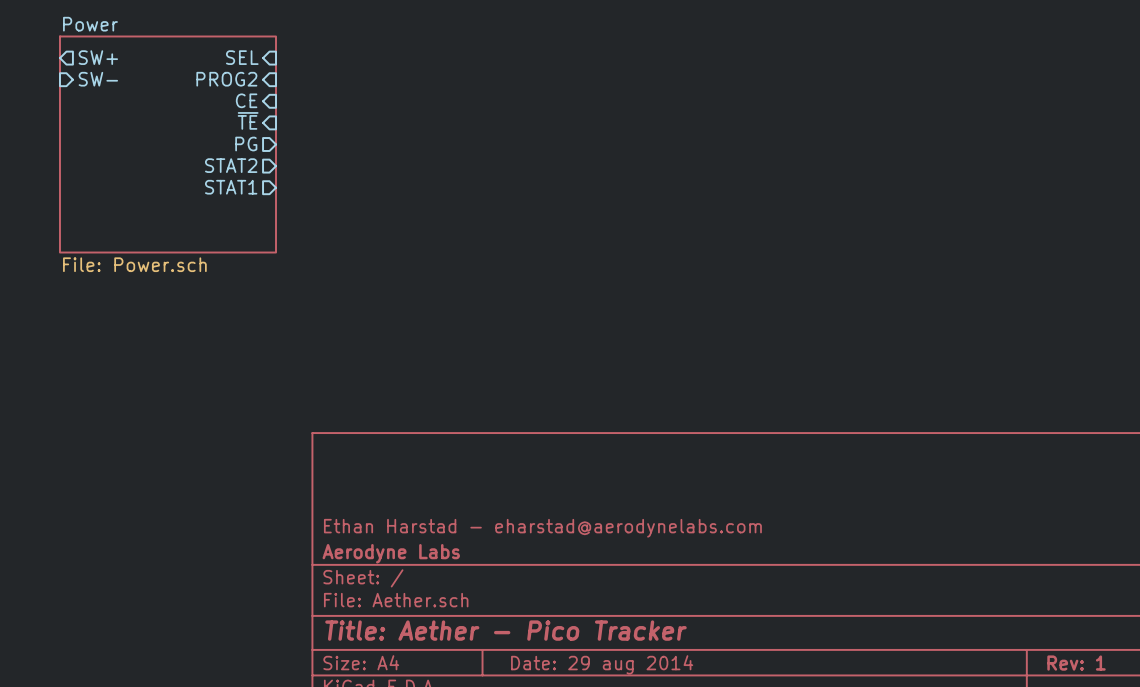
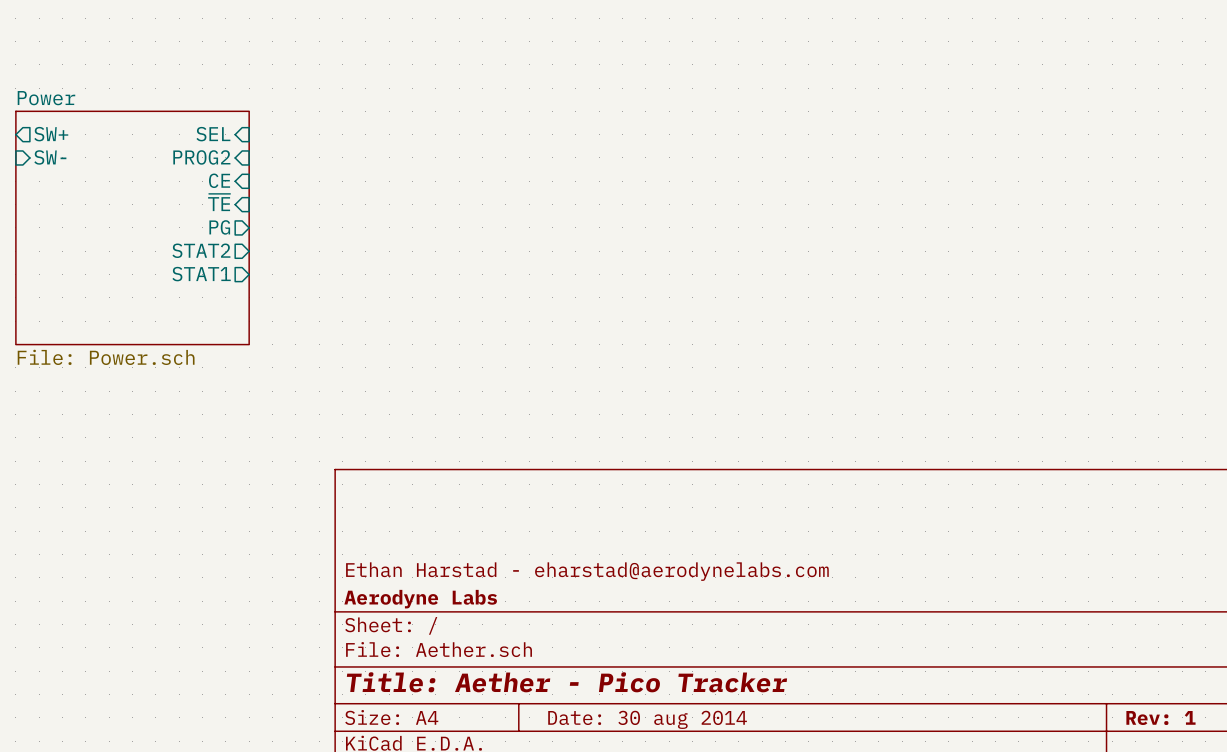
sheet pin position: SW+ (98, 57) -> SW+ (51, 134)
sheet pin position: SEL (242, 57) -> SEL (213, 134)
sheet pin position: SW- (98, 79) -> SW- (50, 157)
sheet pin position: PROG2 (226, 79) -> PROG2 (201, 157)
sheet pin position: CE (246, 100) -> CE (219, 180)
sheet pin position: ~{TE} (248, 120) -> ~{TE} (219, 202)
sheet Power position: (167, 144) -> (132, 227)
sheet pin position: PG (246, 144) -> PG (219, 227)
sheet pin position: STAT2 (231, 165) -> STAT2 (201, 250)
sheet pin position: STAT1 (231, 187) -> STAT1 (201, 274)
title block: Date: 29 aug 2014 (602, 664) -> Date: 30 aug 2014 (647, 719)

